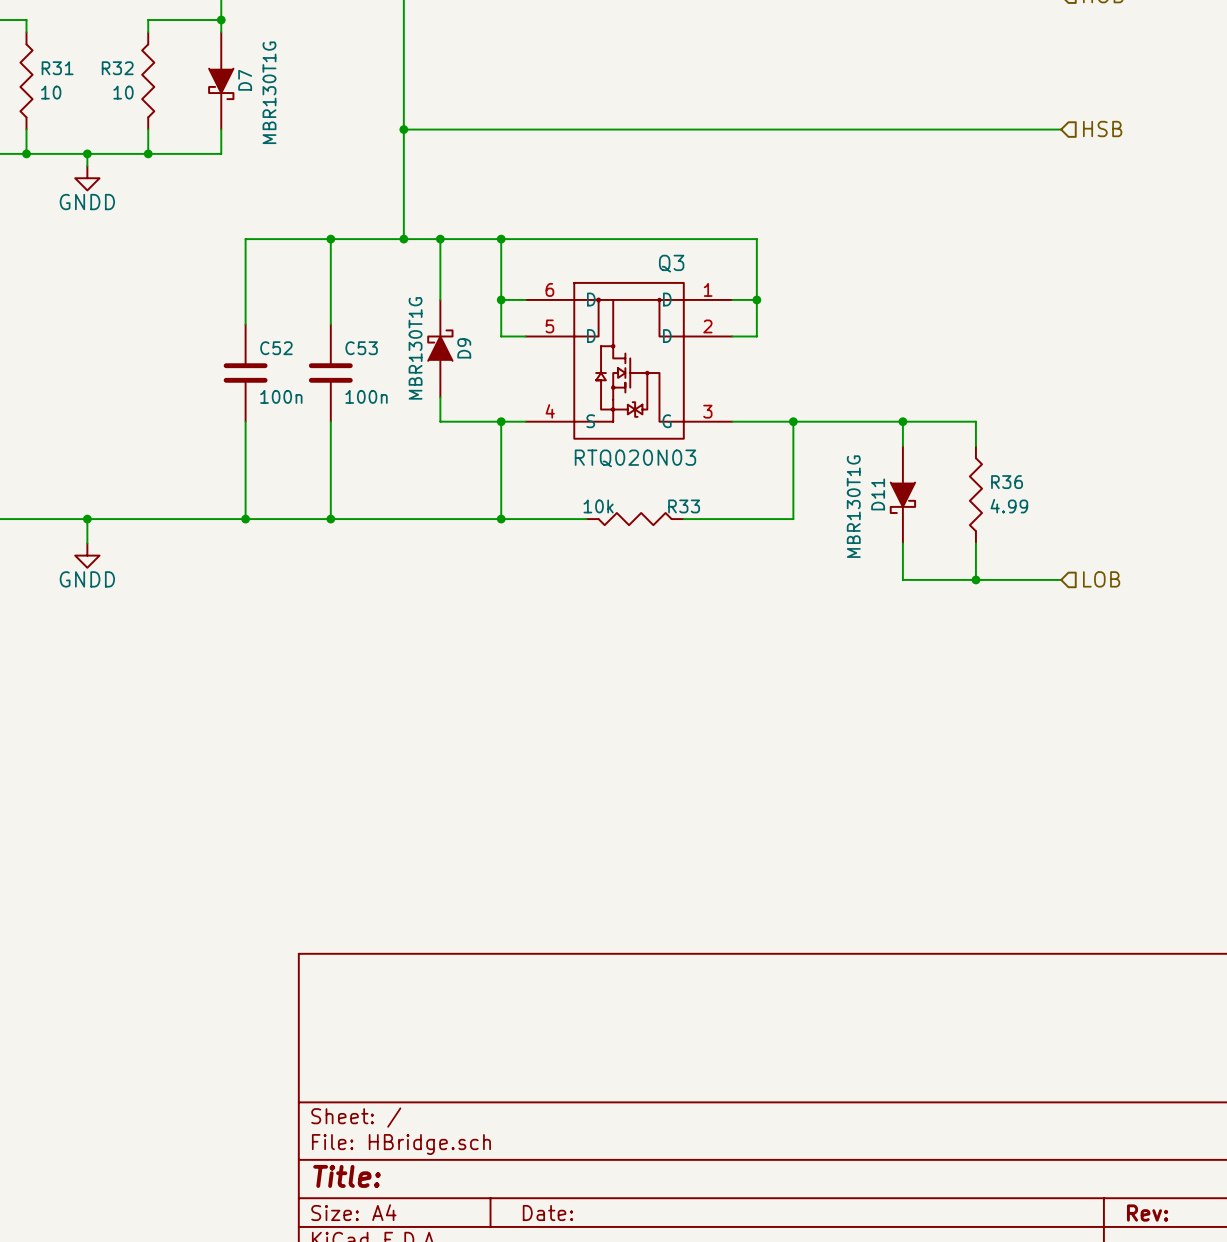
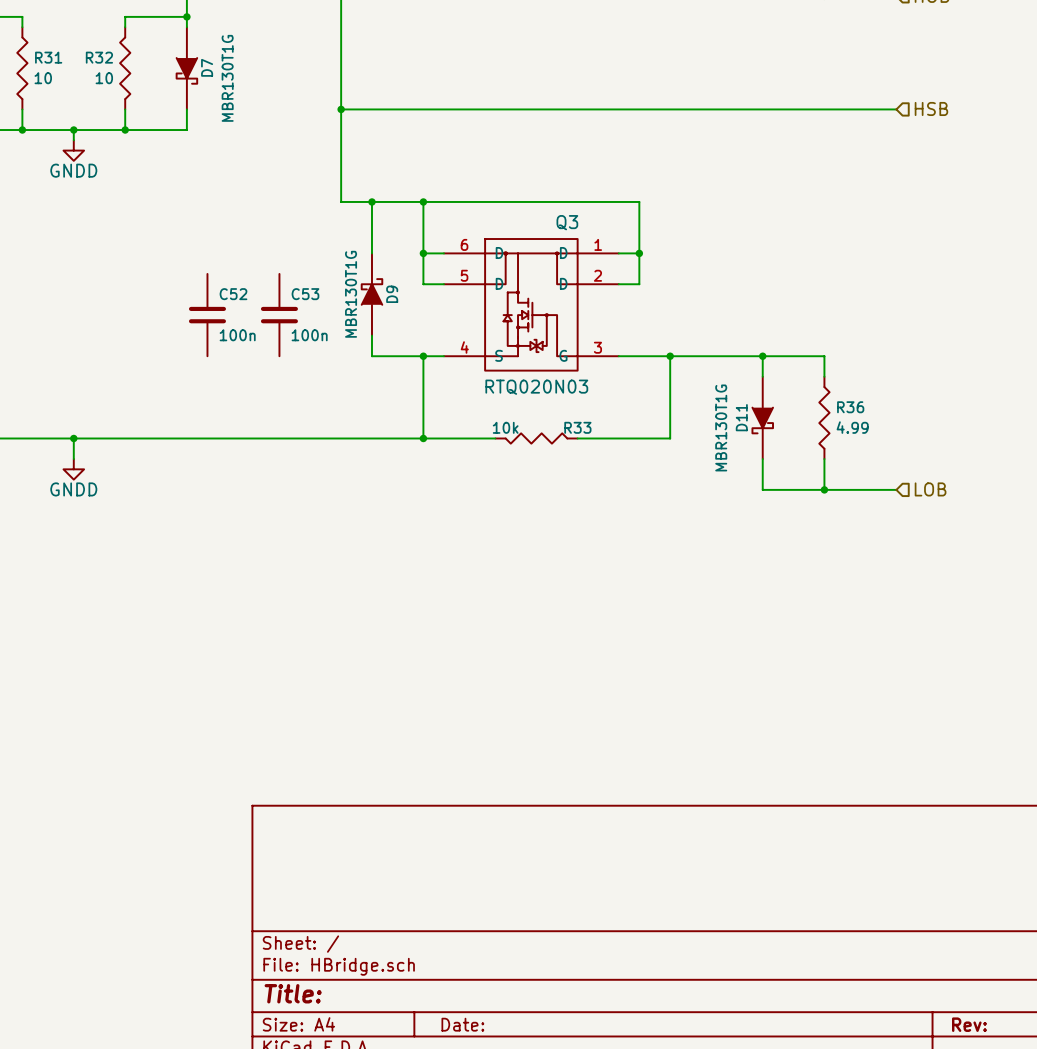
wire: (330, 239) (330, 324) -> none
junction: (330, 239) -> none
wire: (403, 239) (245, 239) (245, 324) -> none
junction: (403, 239) -> none
wire: (245, 421) (245, 519) -> none
wire: (330, 421) (330, 519) -> none
junction: (245, 519) -> none
junction: (330, 519) -> none

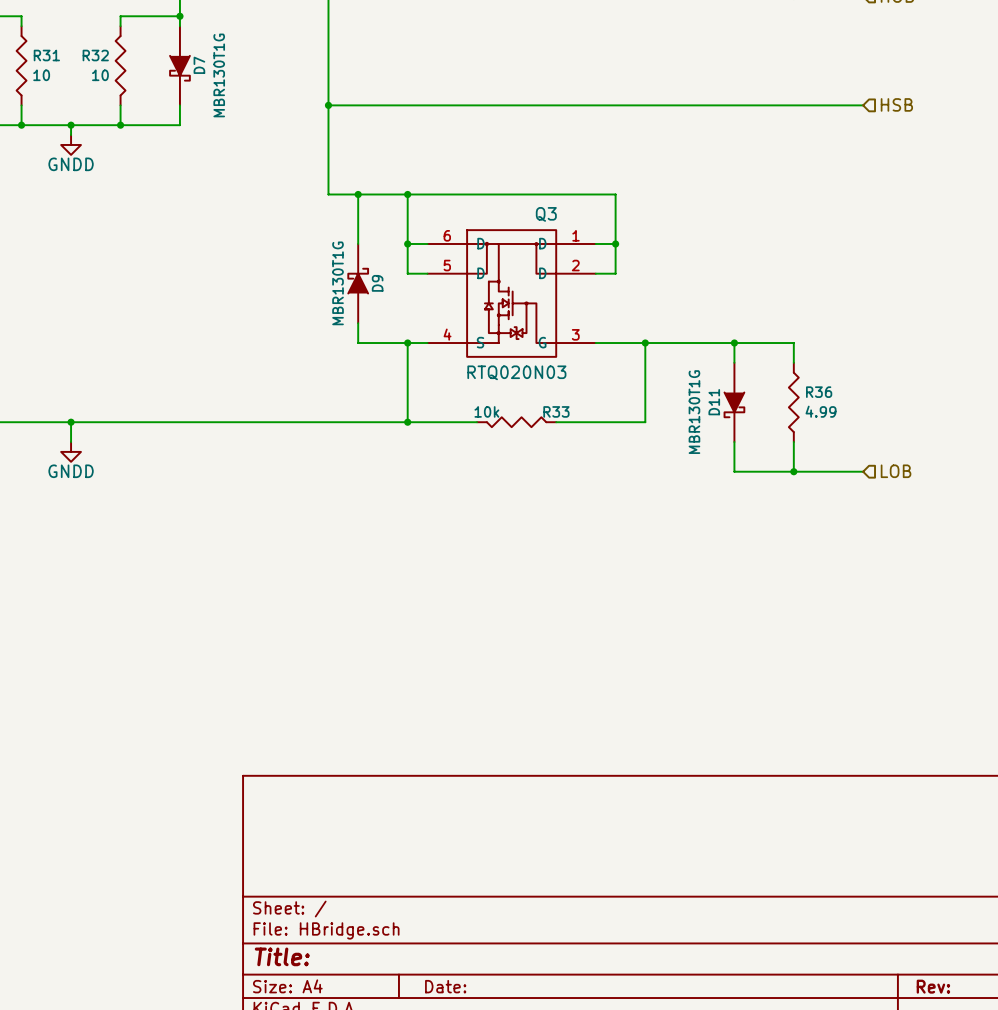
C52: 100n (207, 315) -> none
C53: 100n (279, 315) -> none

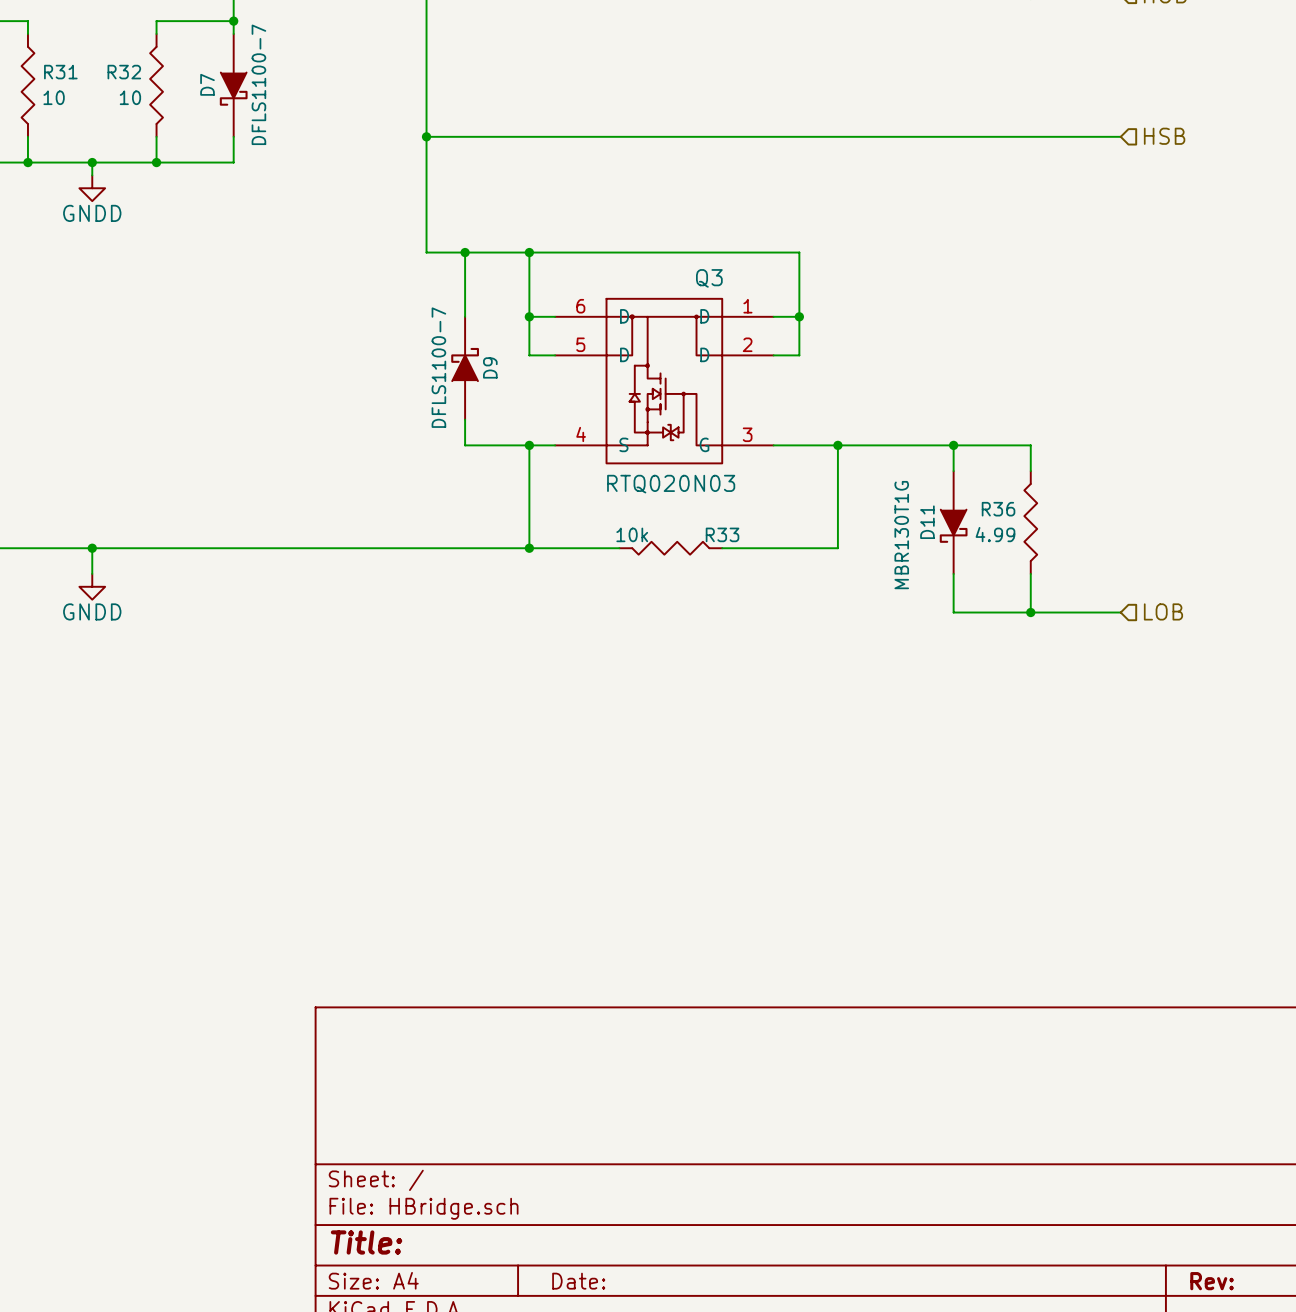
D7 flip: as is (179, 68) -> left-right (233, 89)
D7 value: MBR130T1G (219, 75) -> DFLS1100-7 (258, 84)
D9 value: MBR130T1G (338, 283) -> DFLS1100-7 (438, 367)
R36 flip: as is (793, 402) -> left-right (1030, 522)

